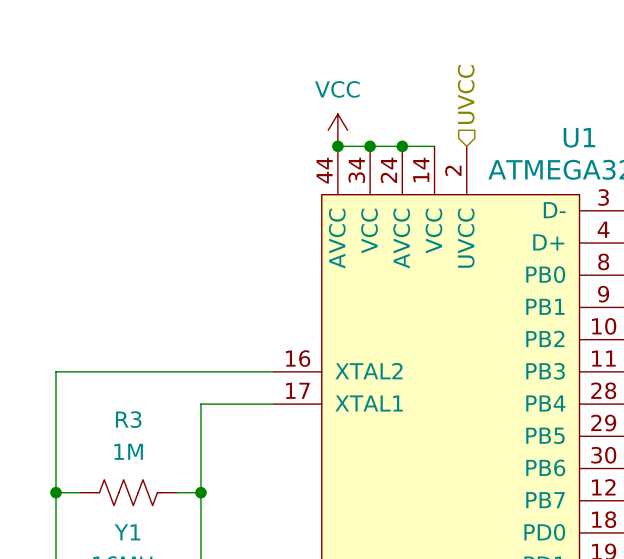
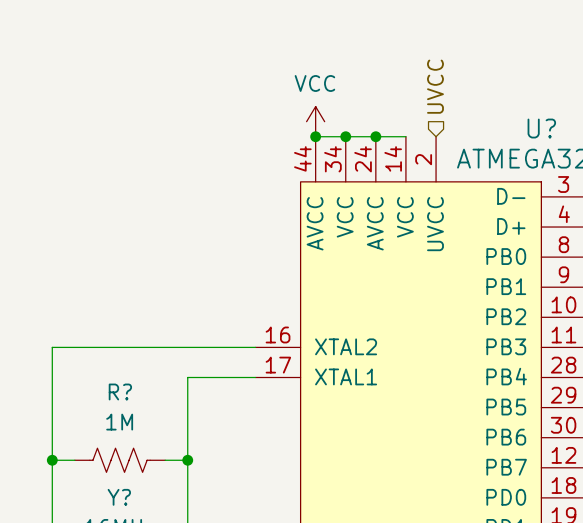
U1 name: U1 (579, 137) -> U? (541, 128)
R3 name: R3 (128, 419) -> R? (120, 391)
Y1 name: Y1 (127, 532) -> Y? (119, 497)

